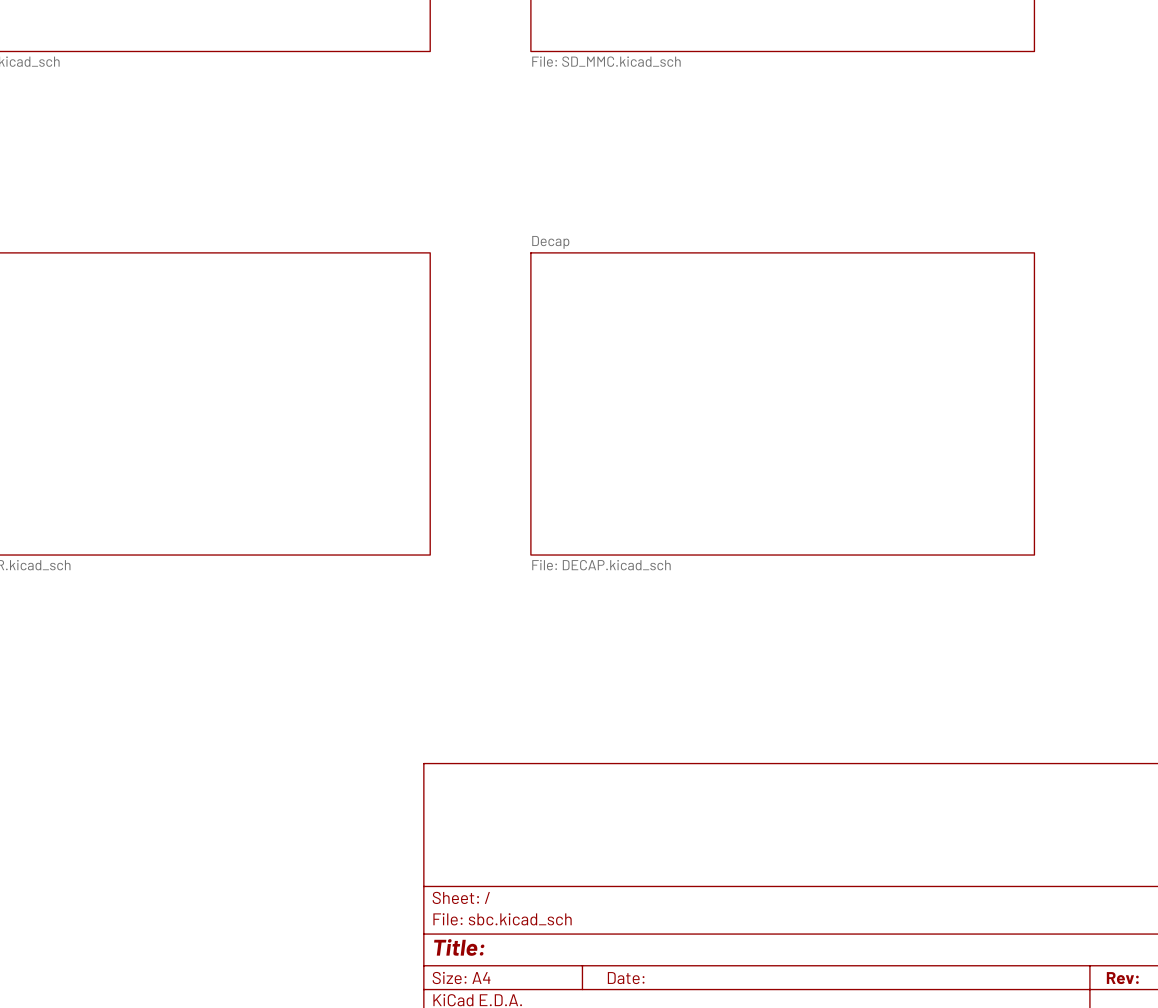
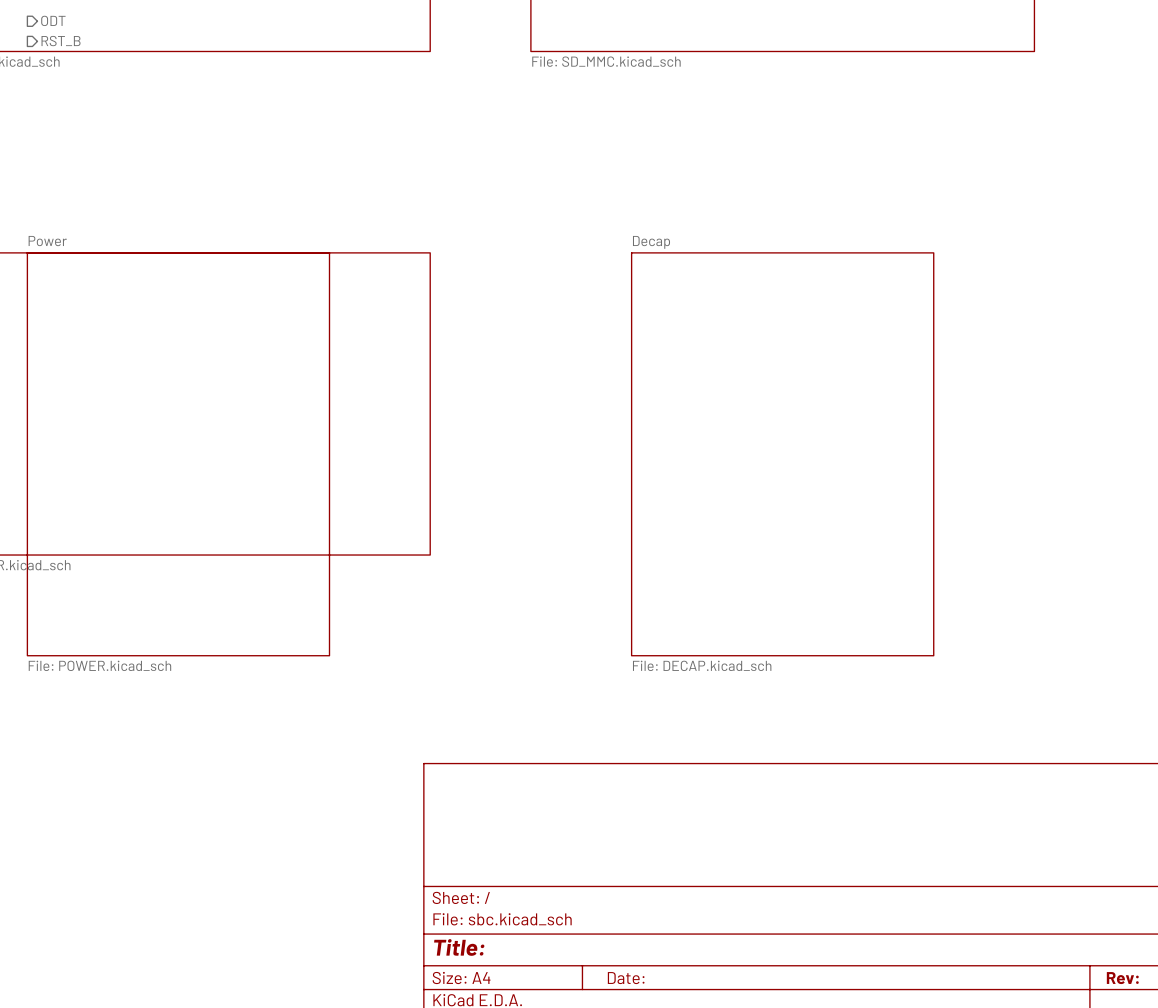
sheet pin: none -> ODT (53, 20)
sheet pin: none -> RST_B (61, 41)
sheet Decap: File: DECAP.kicad_sch (782, 403) -> none
sheet Power: none -> File: POWER.kicad_sch (178, 454)
sheet Decap: none -> File: DECAP.kicad_sch (782, 454)

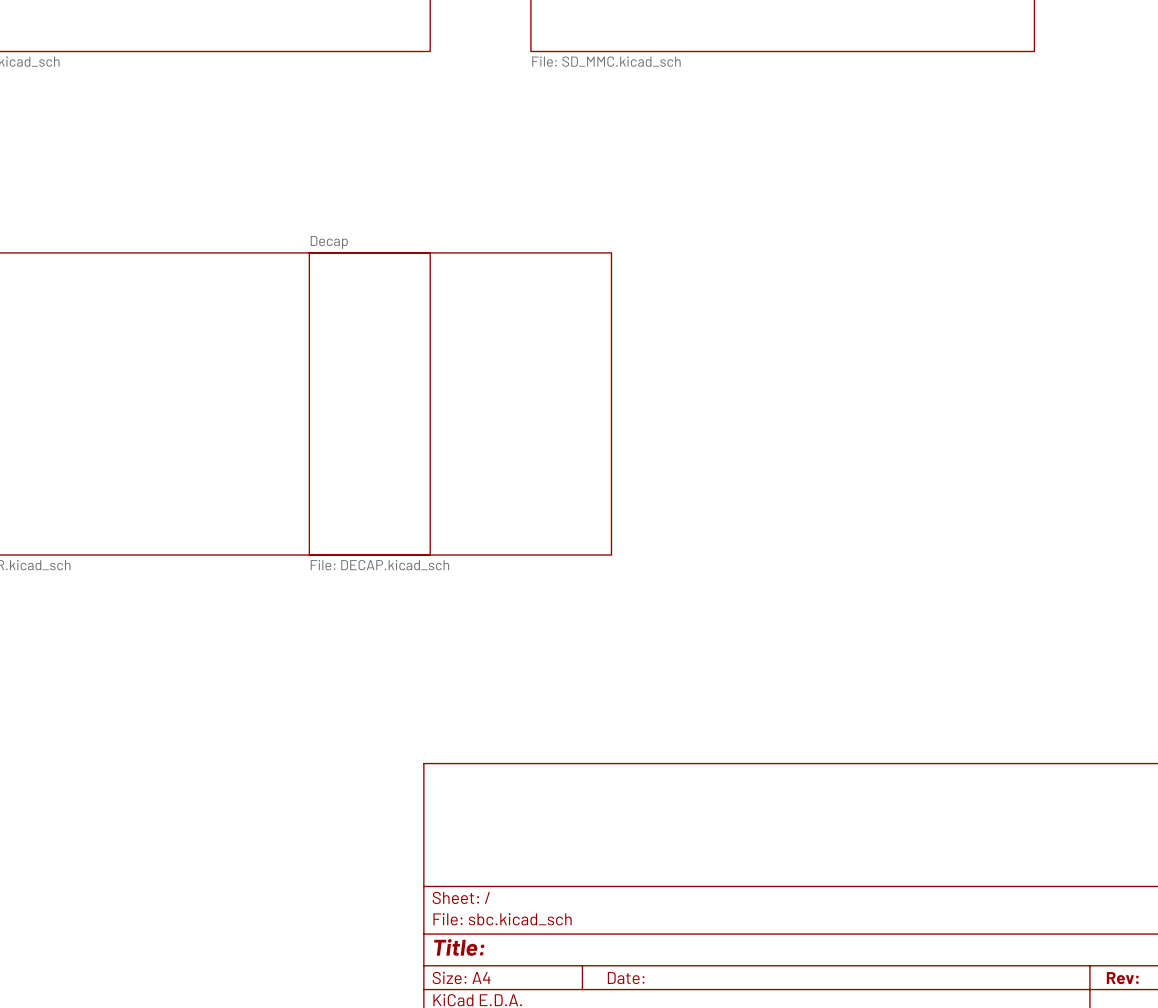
sheet pin: ODT (53, 20) -> none
sheet pin: RST_B (61, 41) -> none
sheet Decap: none -> File: DECAP.kicad_sch (460, 403)
sheet Power: File: POWER.kicad_sch (178, 454) -> none
sheet Decap: File: DECAP.kicad_sch (782, 454) -> none

